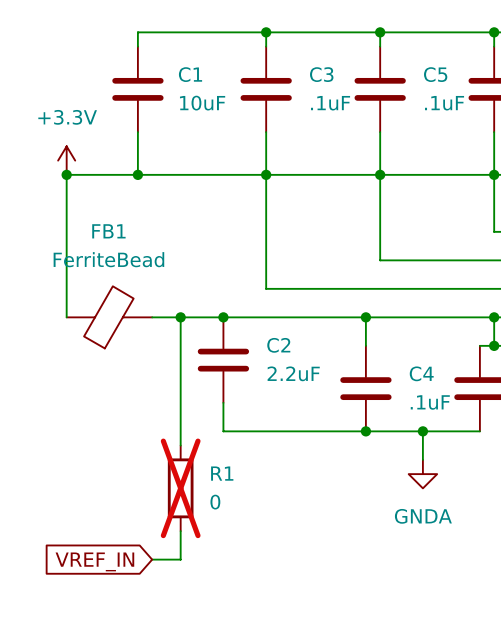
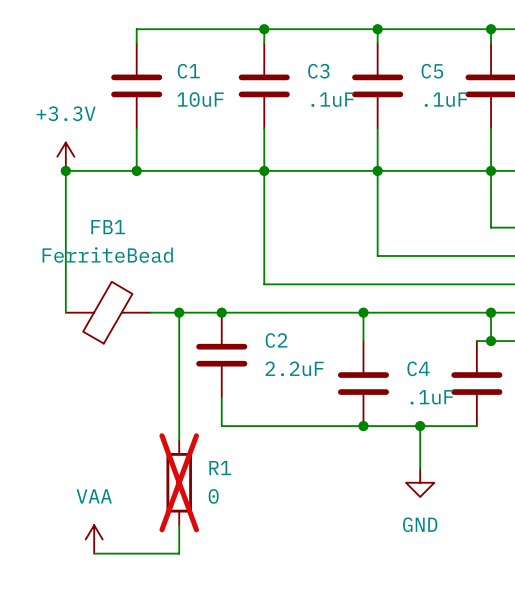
power symbol: GNDA (422, 474) -> none
power symbol: none -> GND (420, 482)
power symbol: none -> VAA (94, 539)
wire: none -> (94, 553) (150, 553)
global label: VREF_IN (94, 561) -> none

